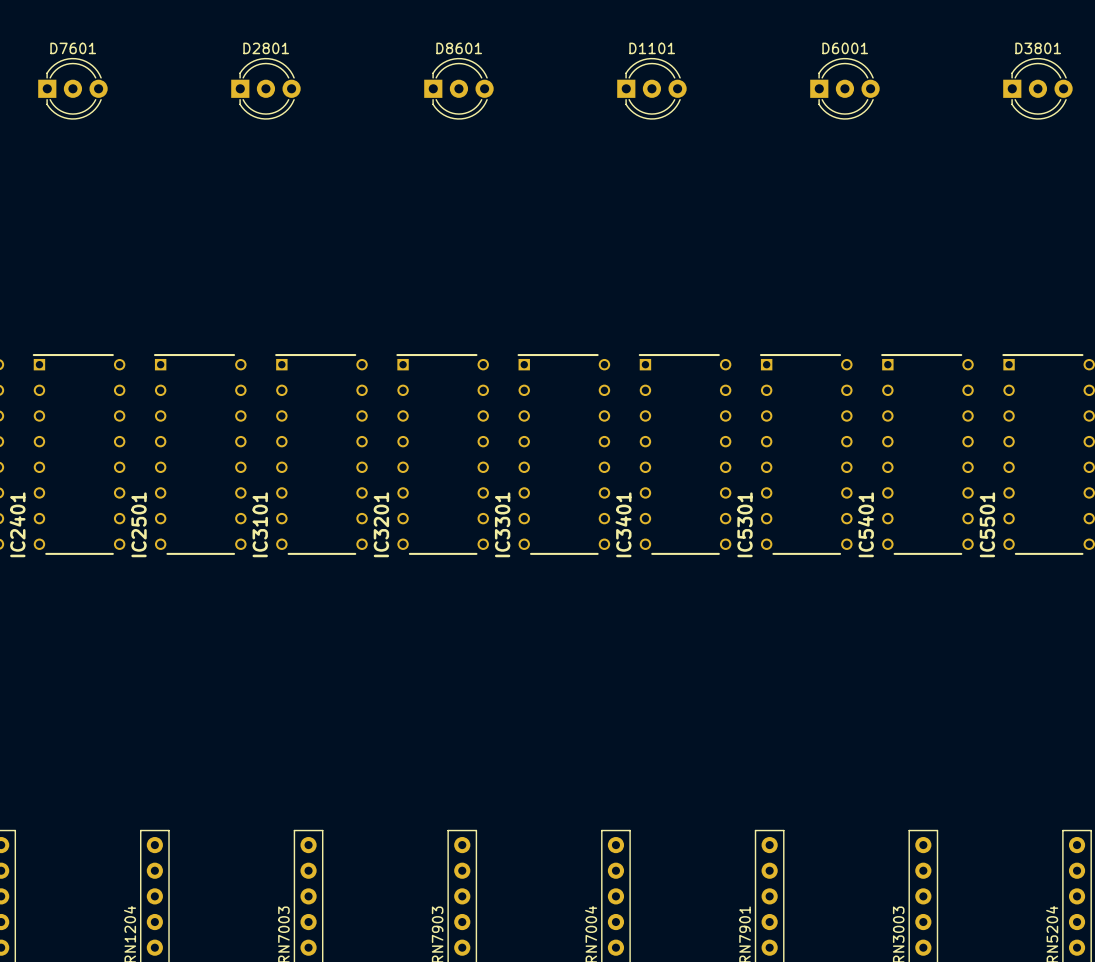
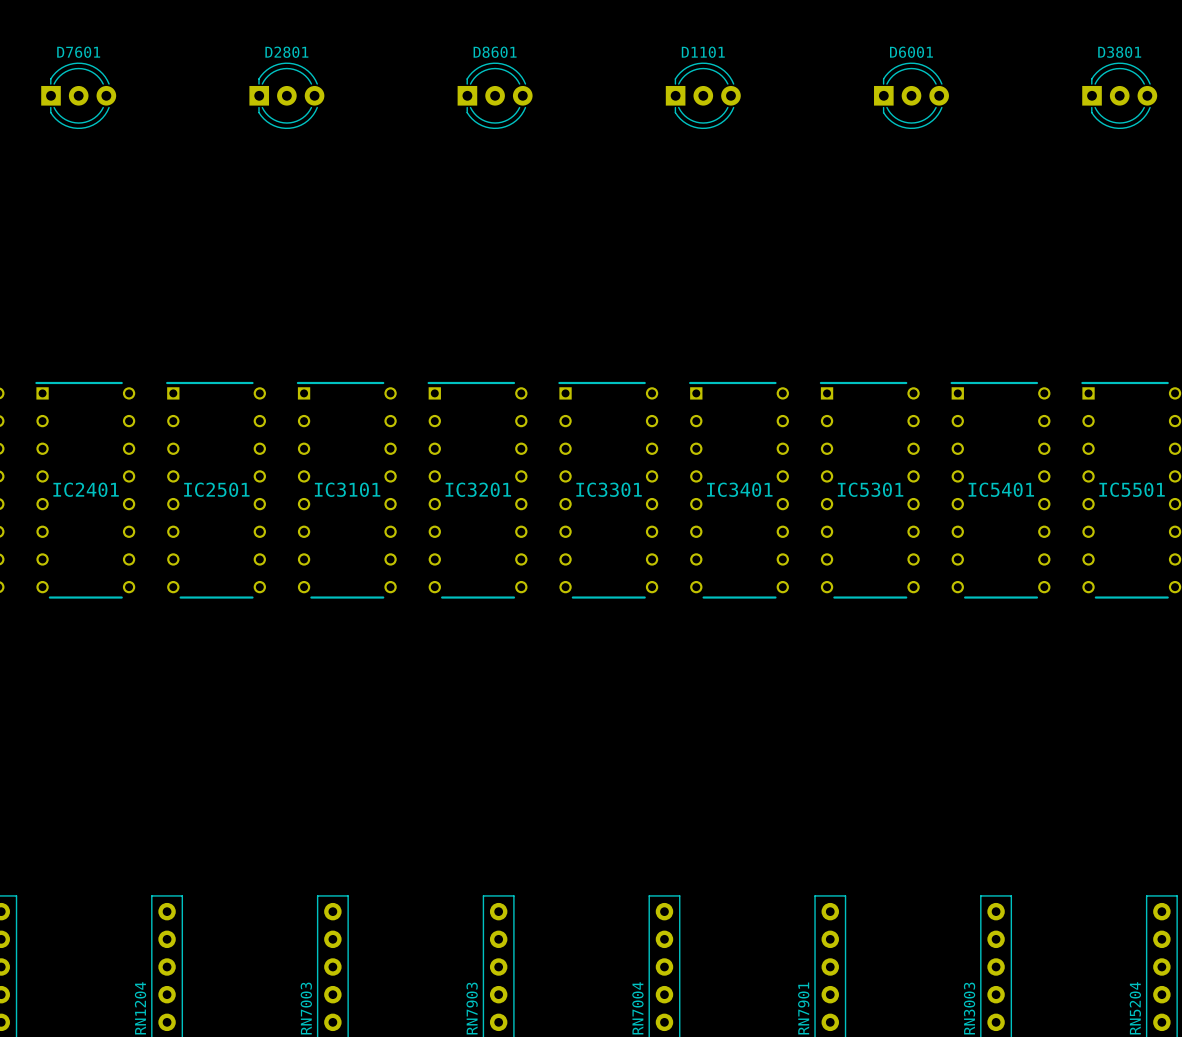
IC2401 name rotation: 0° (17, 524) -> 90° clockwise (86, 489)
IC2401 name position: IC2401 (17, 524) -> IC2401 (86, 489)
IC2501 name rotation: 0° (139, 524) -> 90° clockwise (216, 489)
IC2501 name position: IC2501 (139, 524) -> IC2501 (216, 489)
IC3101 name rotation: 0° (260, 524) -> 90° clockwise (347, 489)
IC3101 name position: IC3101 (260, 524) -> IC3101 (347, 489)
IC3201 name rotation: 0° (381, 524) -> 90° clockwise (478, 489)
IC3201 name position: IC3201 (381, 524) -> IC3201 (478, 489)
IC3301 name rotation: 0° (502, 524) -> 90° clockwise (609, 489)
IC3301 name position: IC3301 (502, 524) -> IC3301 (609, 489)
IC3401 name rotation: 0° (623, 524) -> 90° clockwise (739, 489)
IC3401 name position: IC3401 (623, 524) -> IC3401 (739, 489)
IC5301 name rotation: 0° (745, 524) -> 90° clockwise (870, 489)
IC5301 name position: IC5301 (745, 524) -> IC5301 (870, 489)
IC5401 name rotation: 0° (865, 524) -> 90° clockwise (1001, 489)
IC5401 name position: IC5401 (865, 524) -> IC5401 (1001, 489)
IC5501 name rotation: 0° (987, 524) -> 90° clockwise (1132, 489)
IC5501 name position: IC5501 (987, 524) -> IC5501 (1132, 489)

